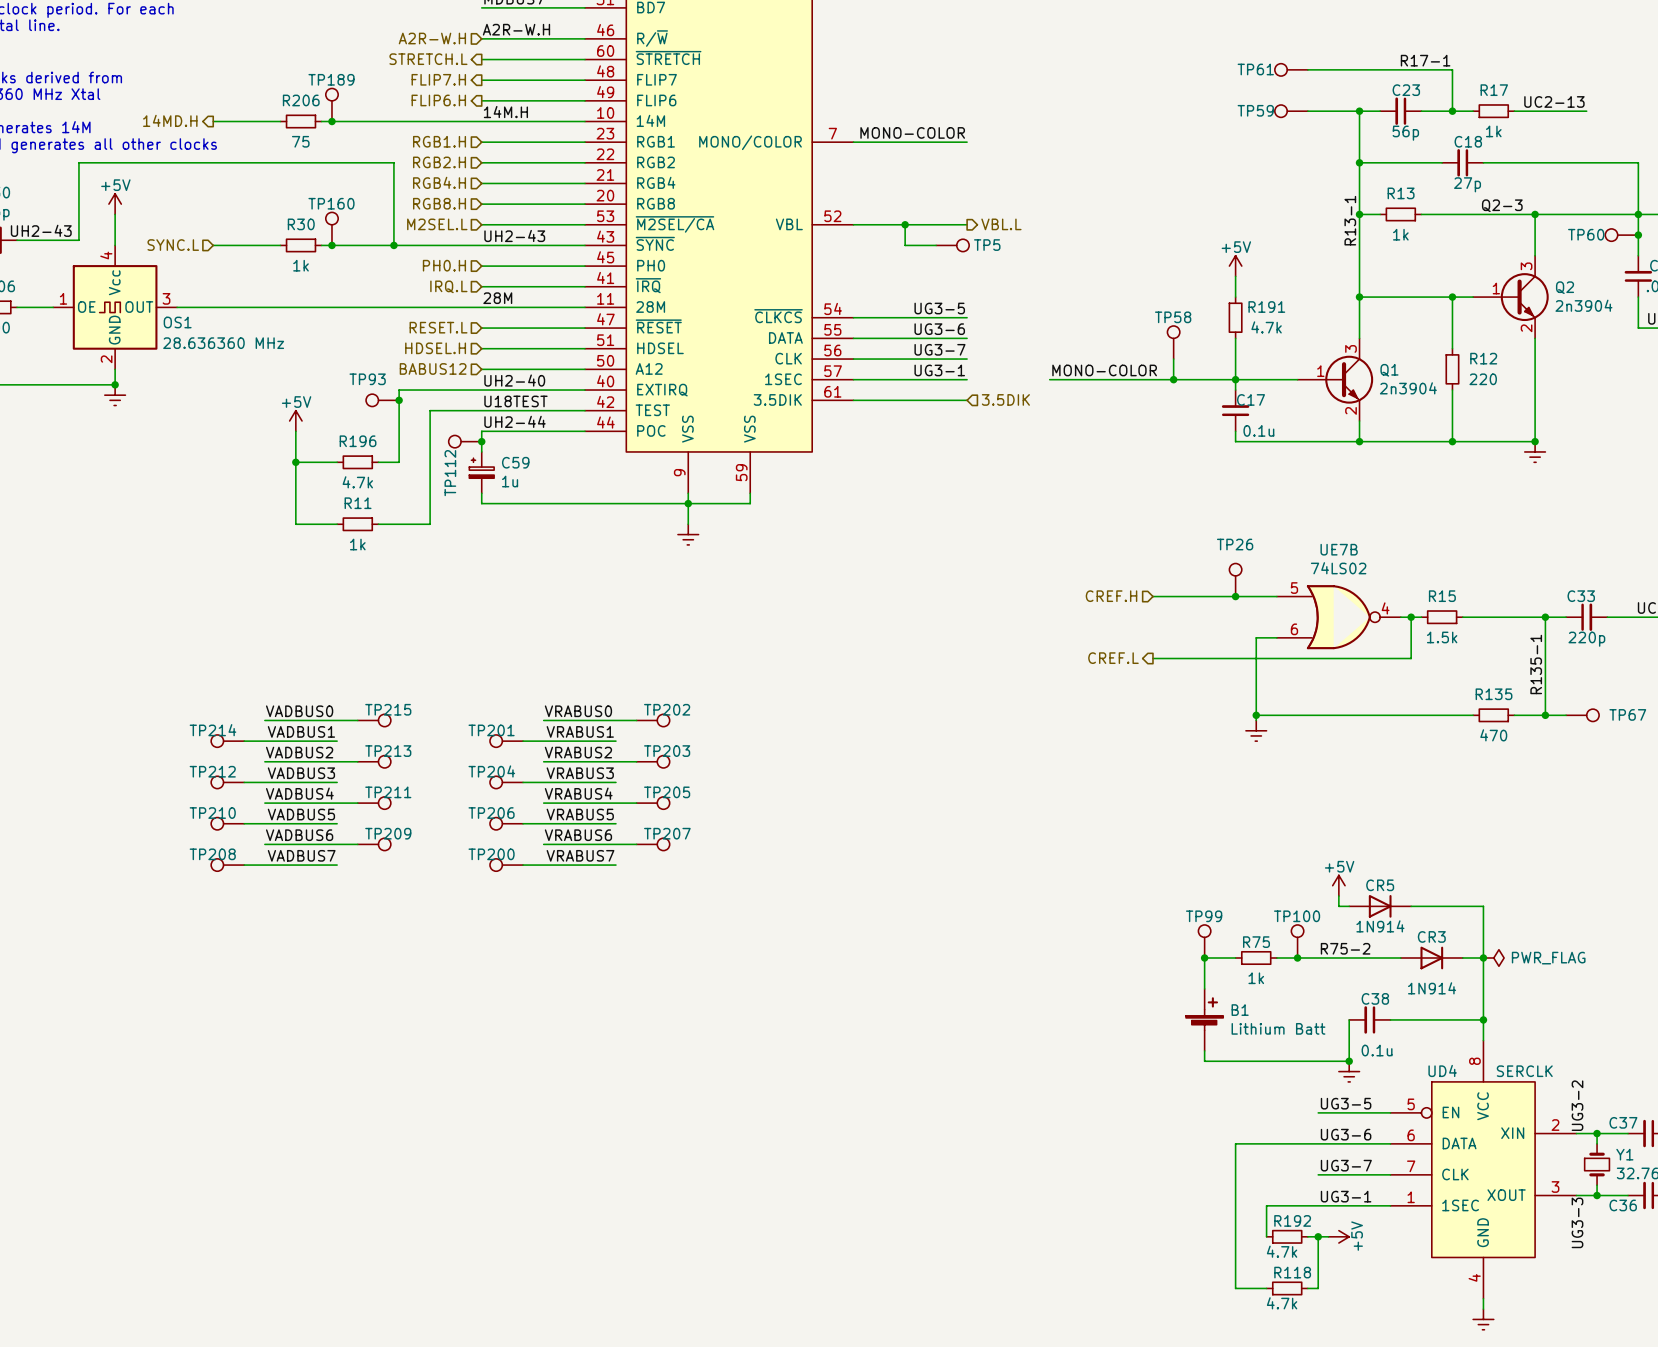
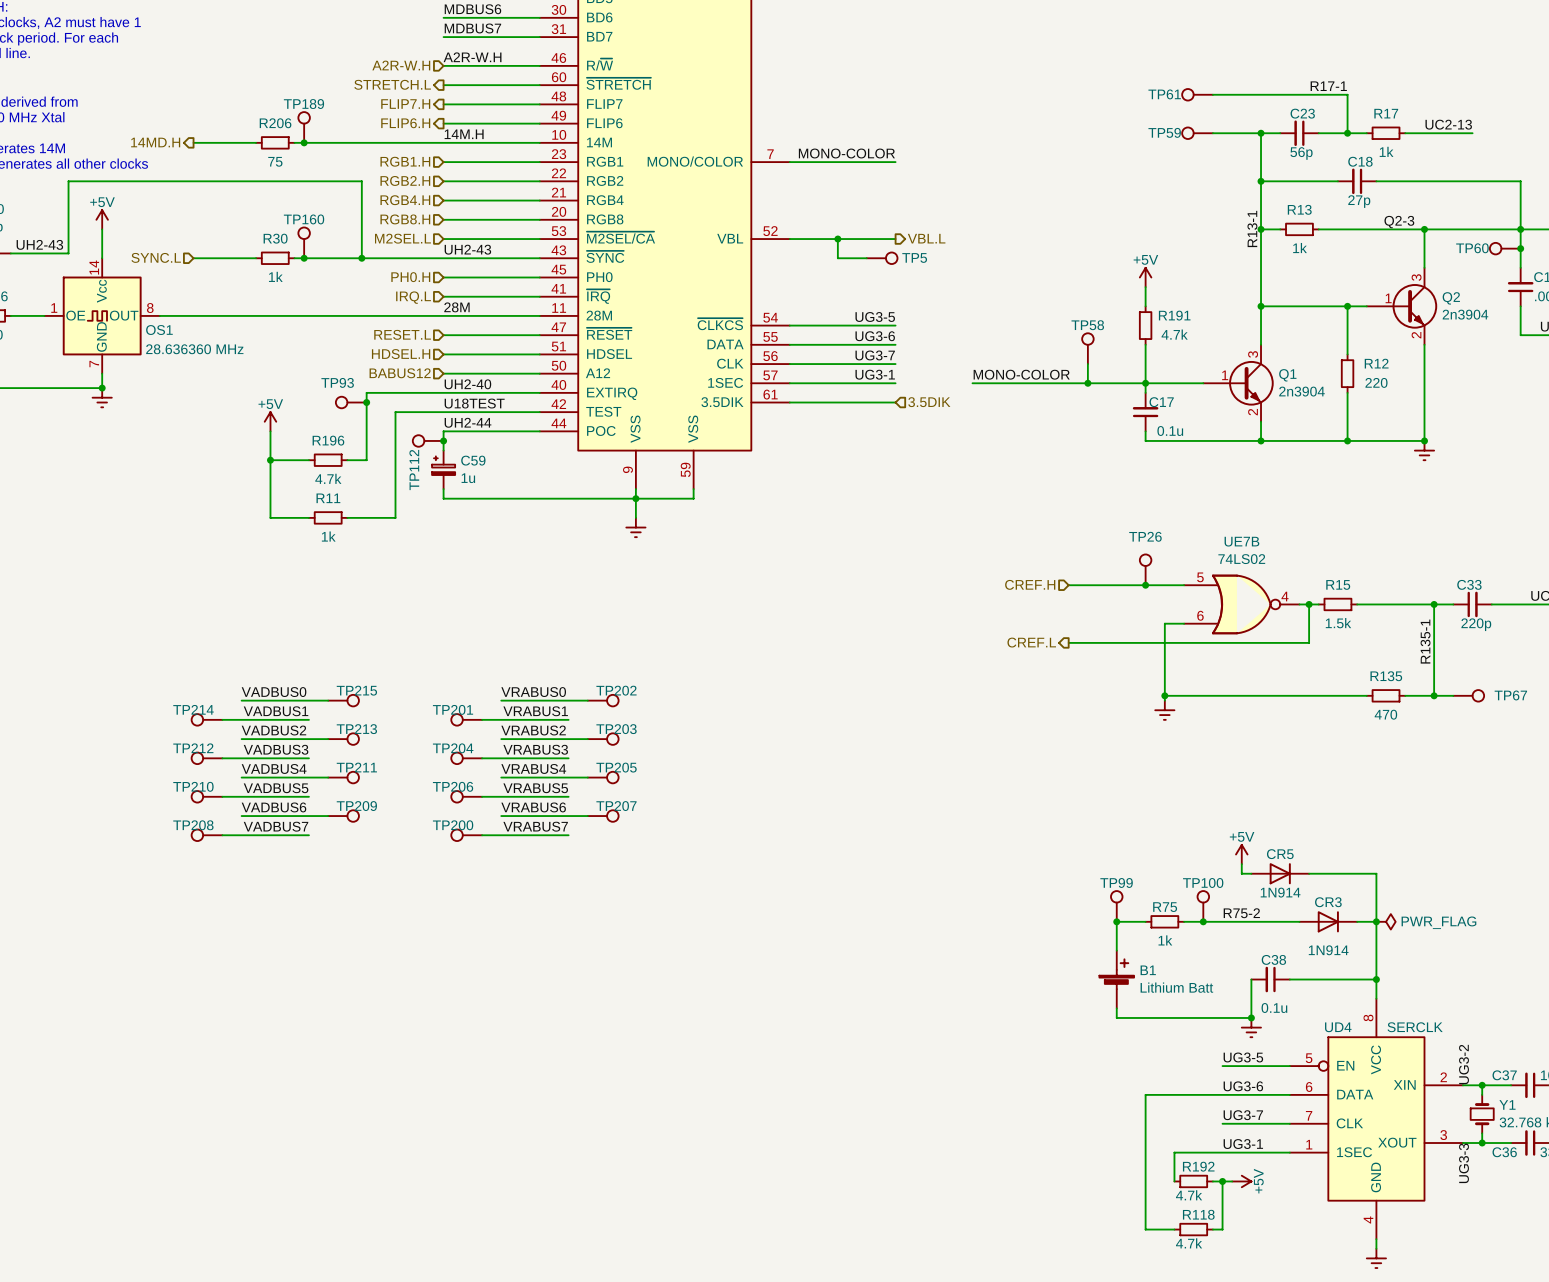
OS1 pin number: 4 (106, 255) -> 14 (94, 267)
OS1 pin number: 3 (166, 298) -> 8 (150, 308)
OS1 pin number: 2 (106, 359) -> 7 (94, 364)

